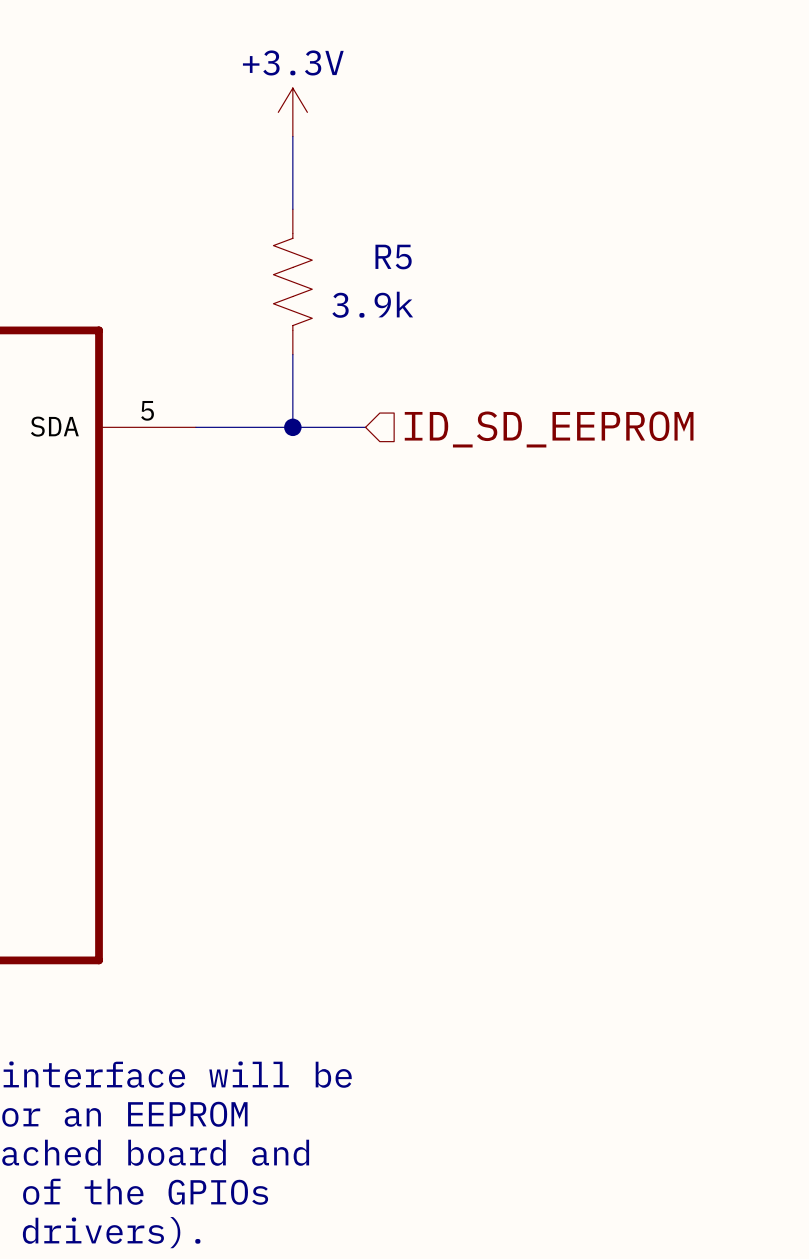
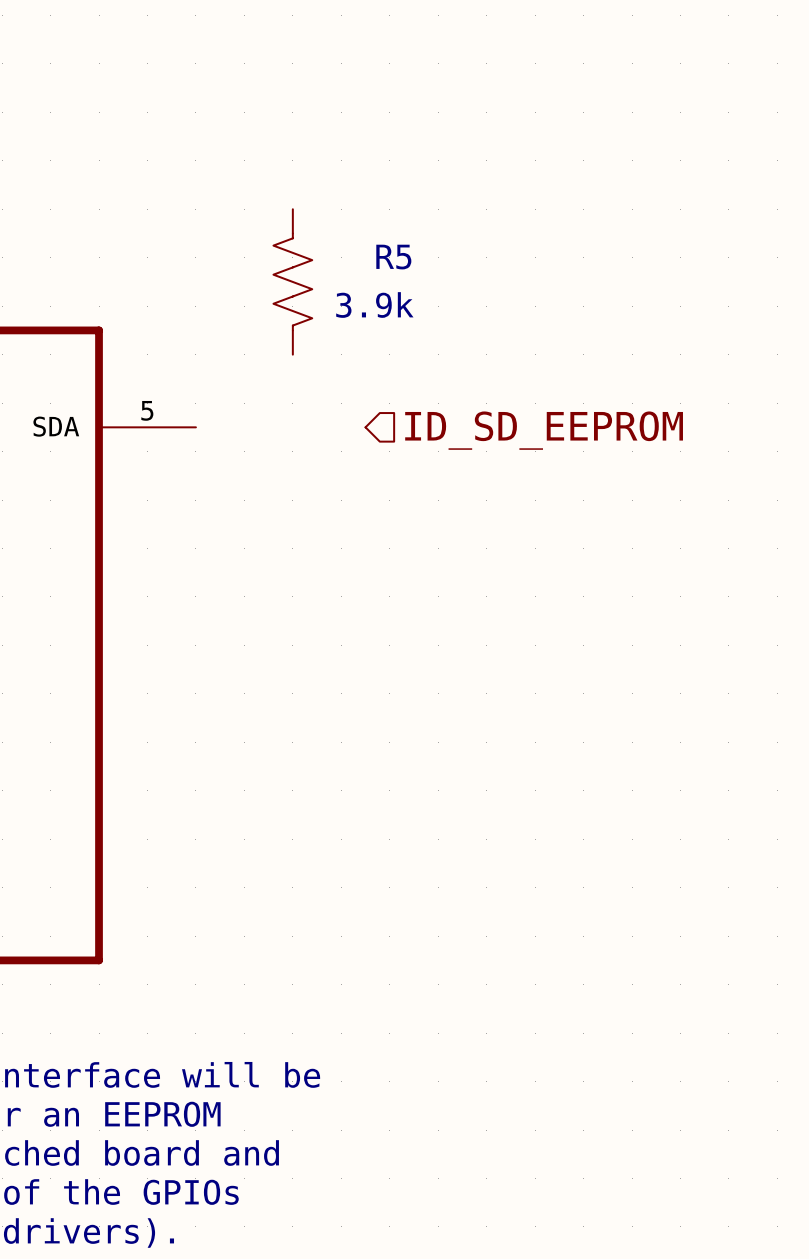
power symbol: +3.3V (292, 112) -> none
wire: (292, 136) (292, 209) -> none
wire: (292, 354) (292, 427) -> none
wire: (195, 427) (365, 427) -> none
junction: (292, 427) -> none

